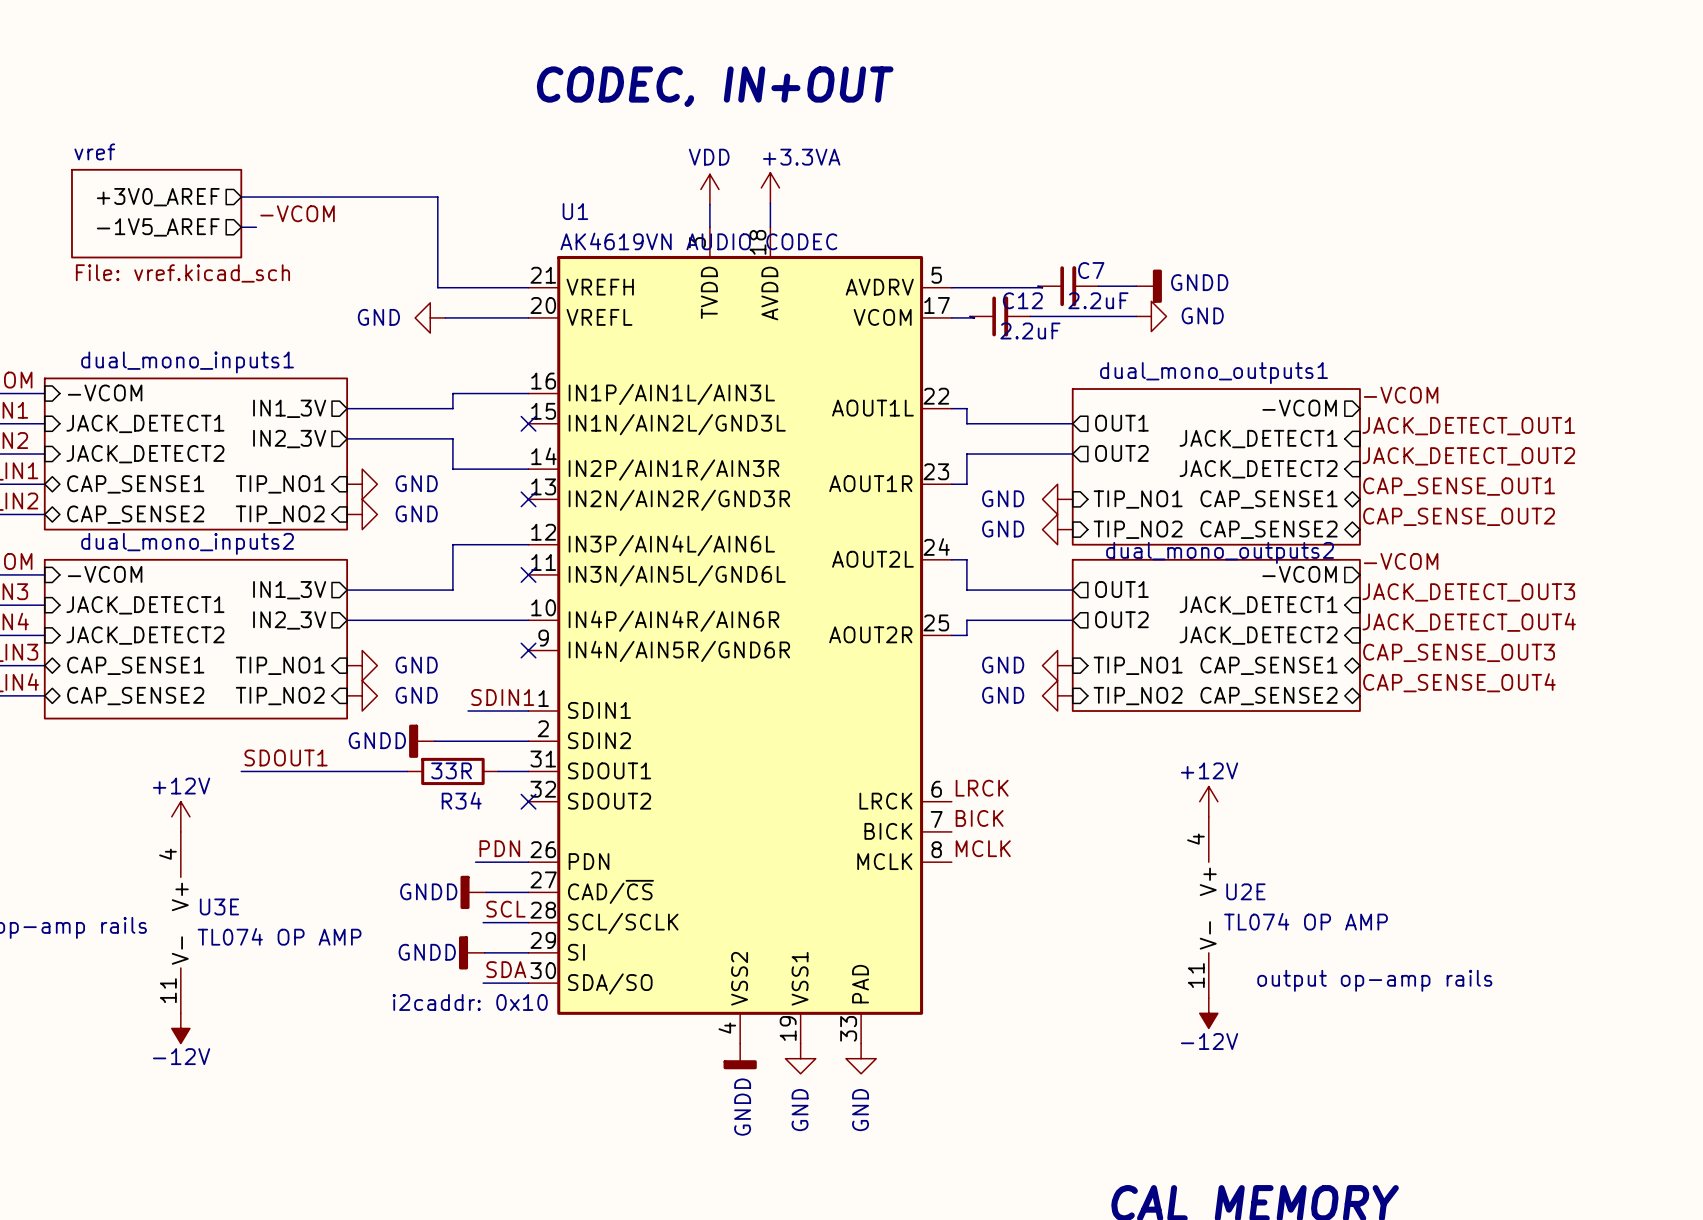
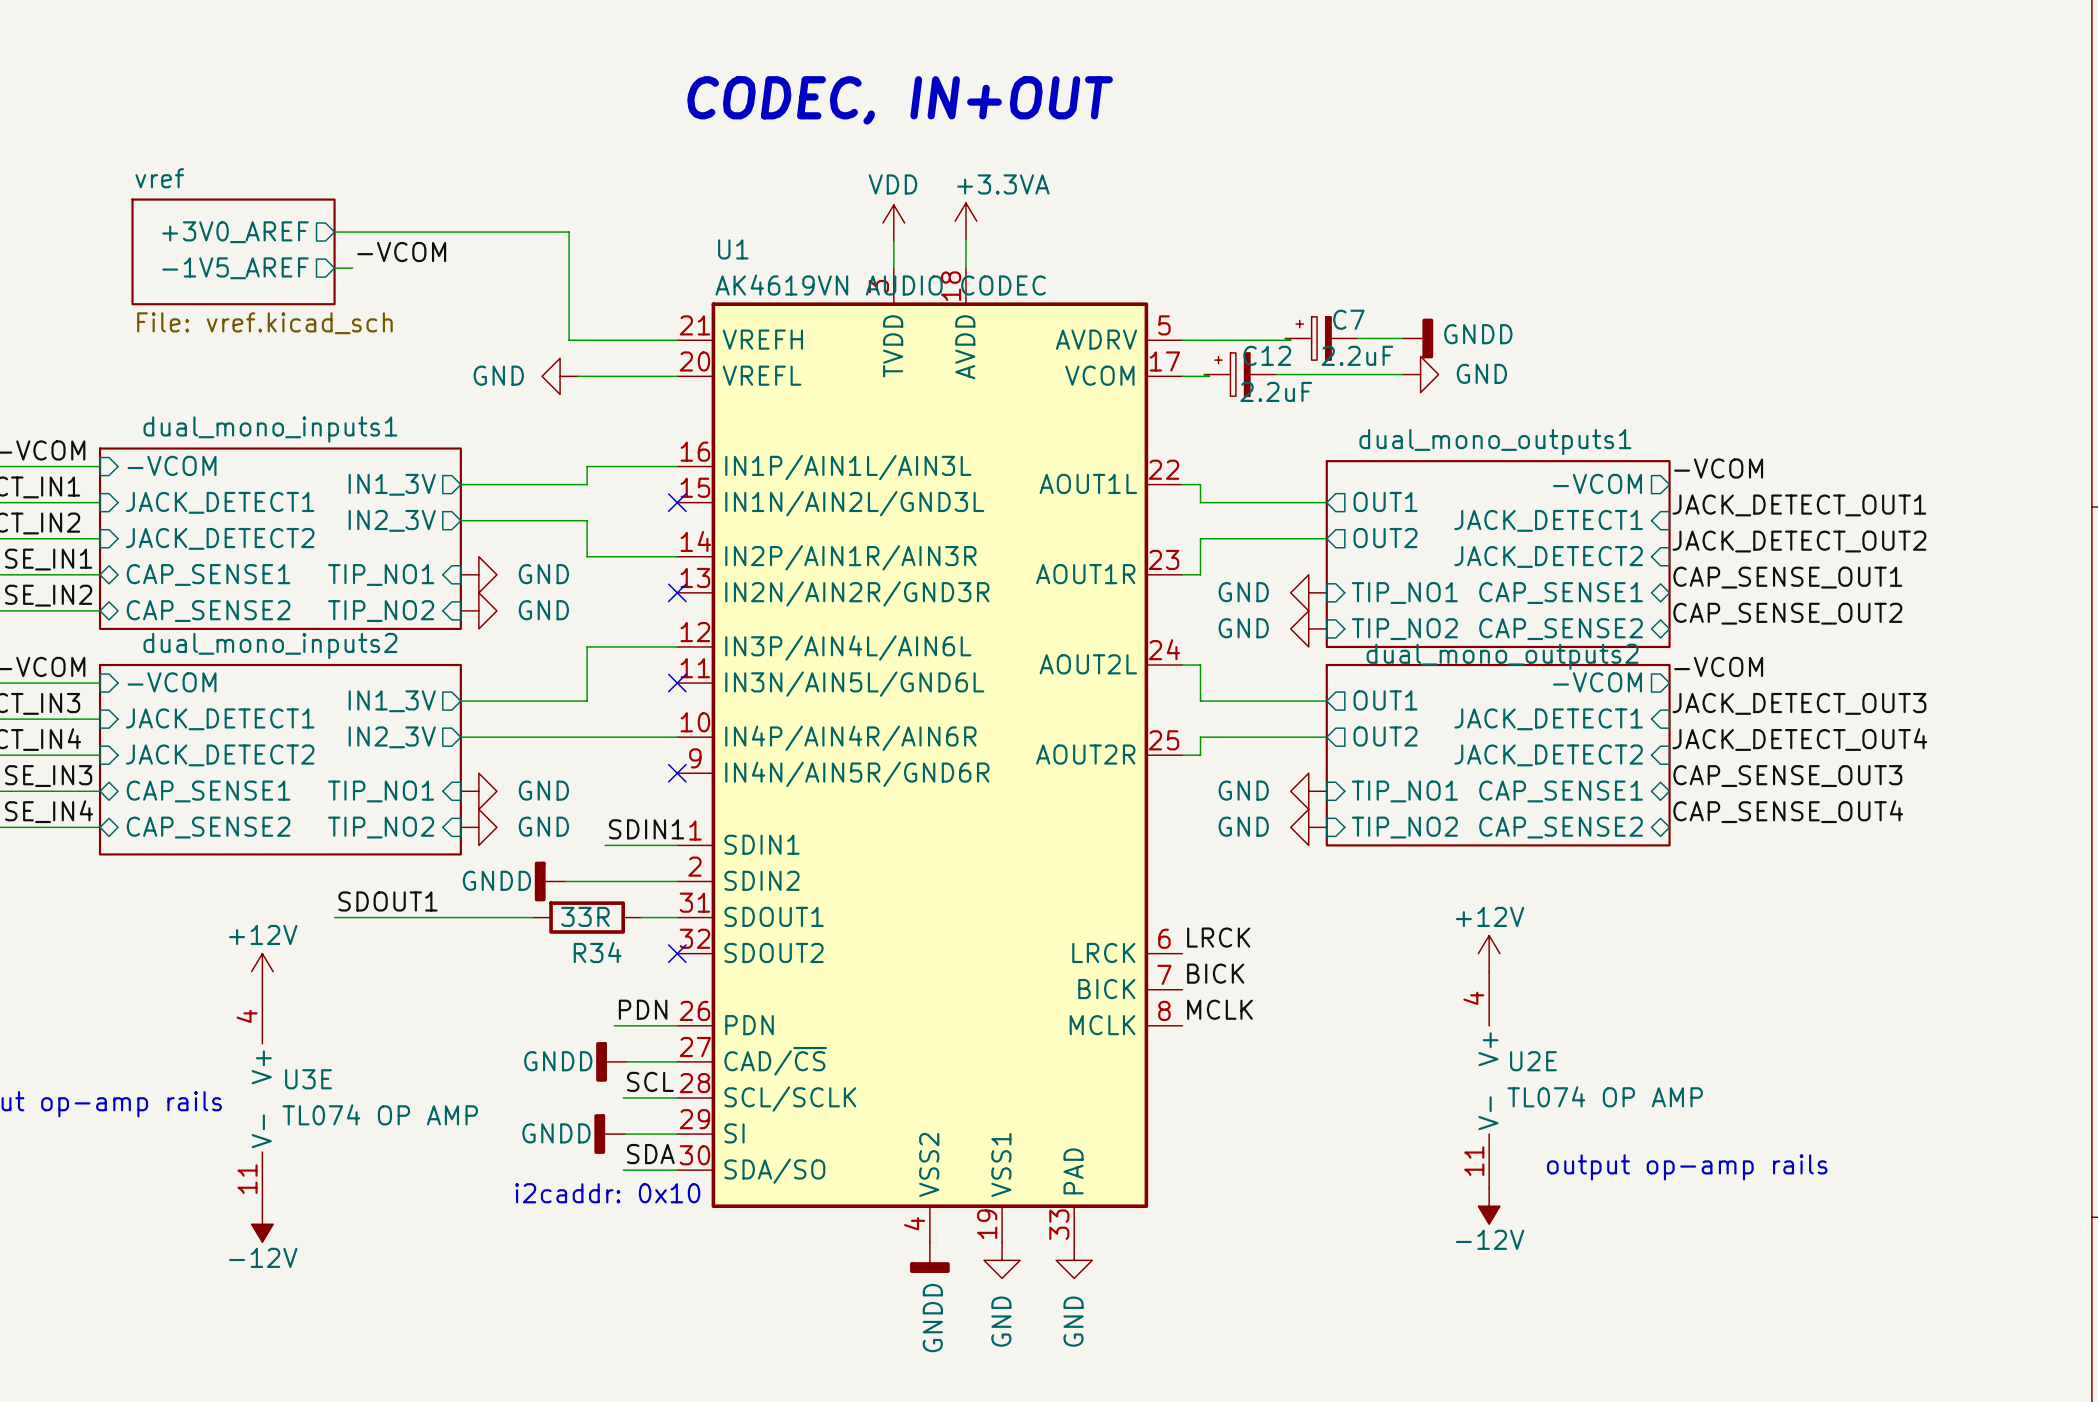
C7 symbol: [1037, 266, 1099, 307] -> [1285, 316, 1358, 361]
C12 symbol: [969, 296, 1031, 337] -> [1204, 352, 1277, 397]

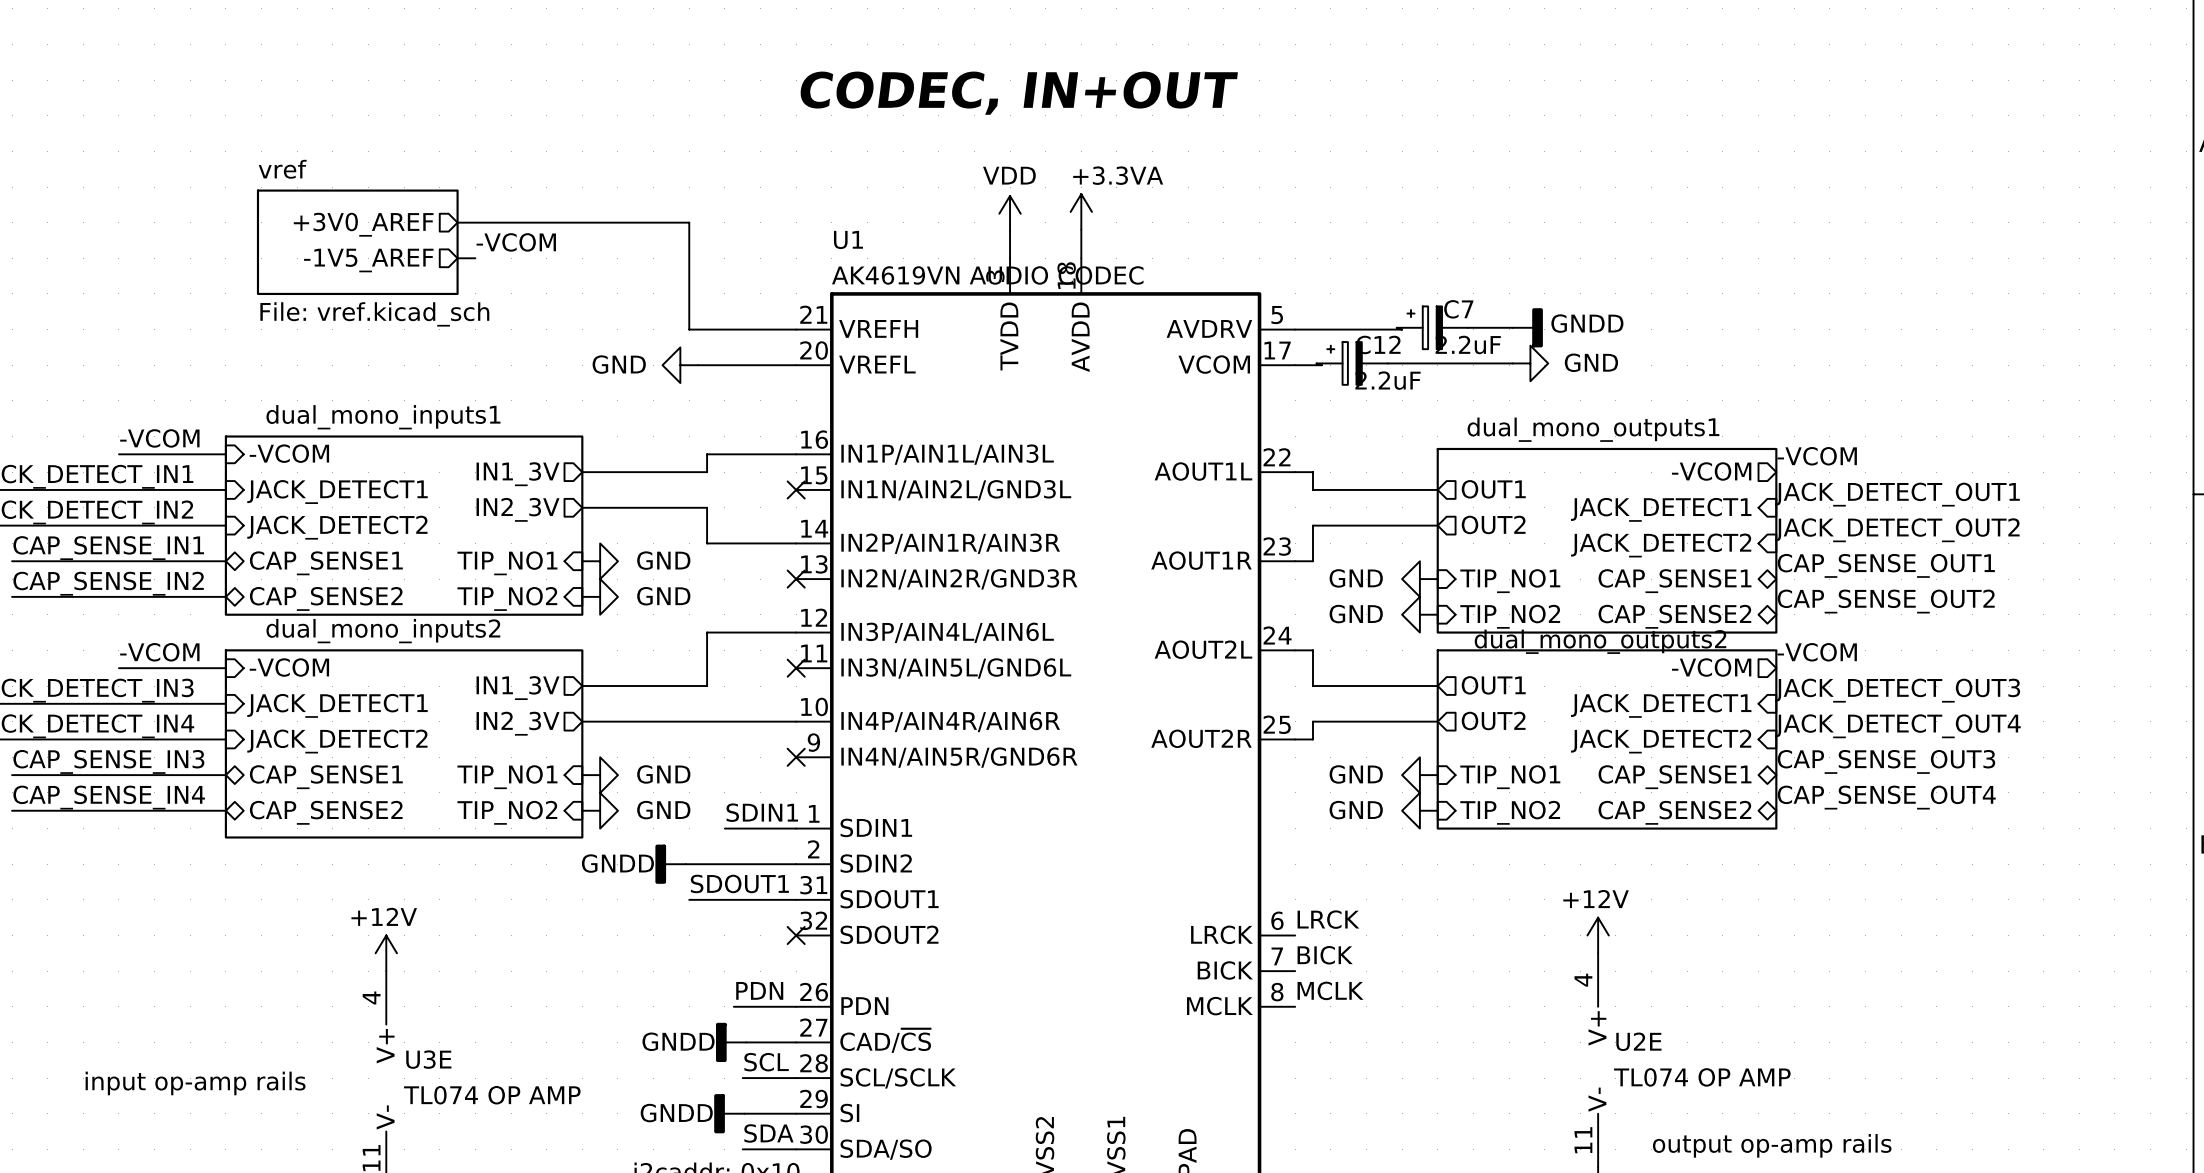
label position: SDOUT1 (387, 901) -> SDOUT1 (739, 883)
wire: (334, 917) (533, 917) -> none
wire: none -> (689, 899) (760, 899)
R34: 33R (587, 917) -> none

